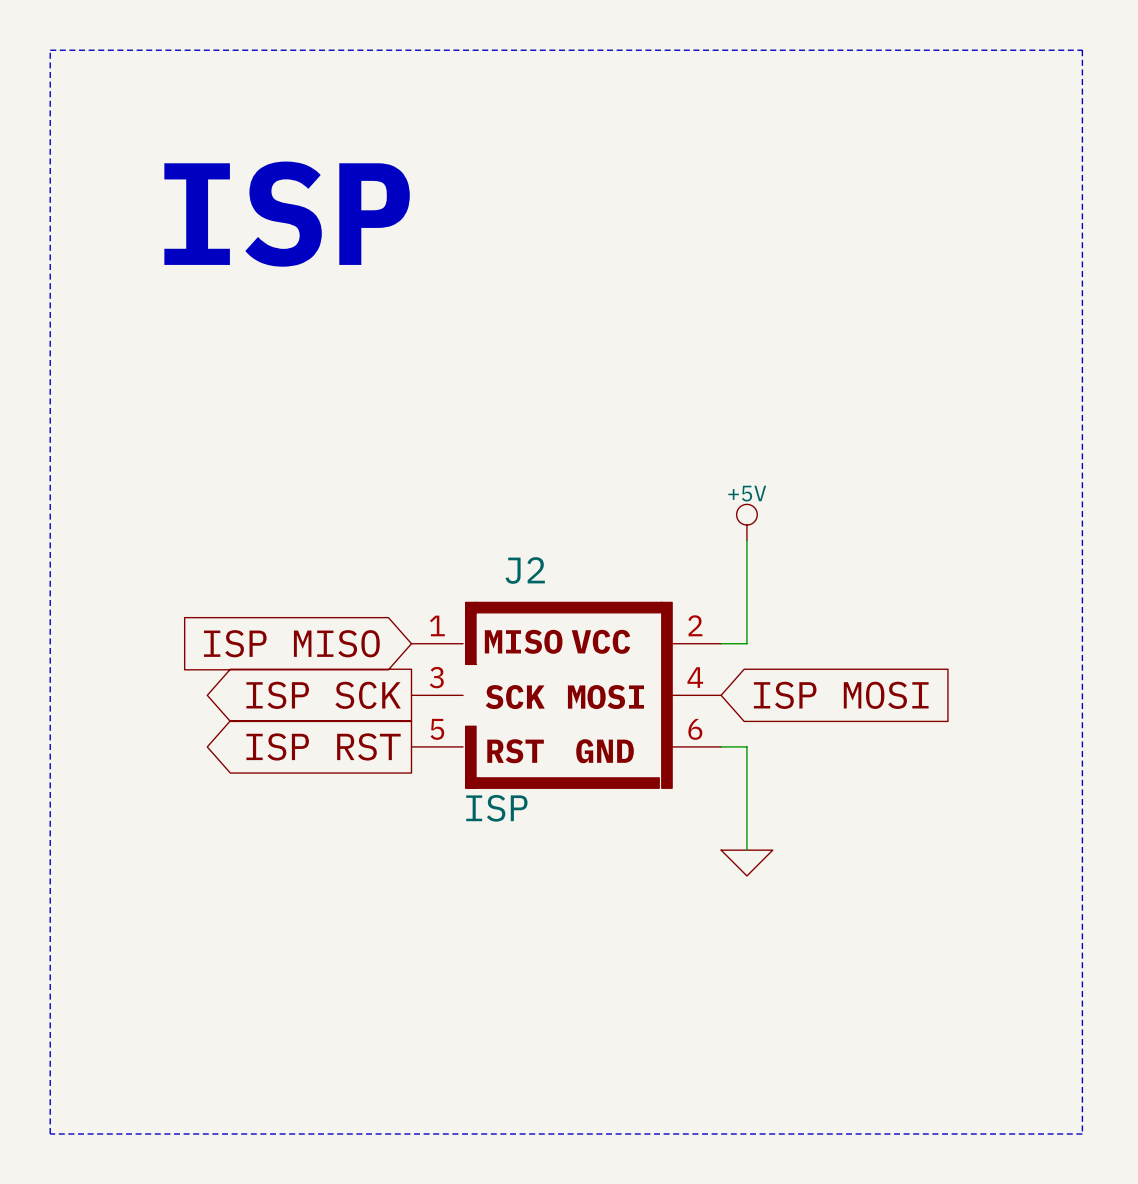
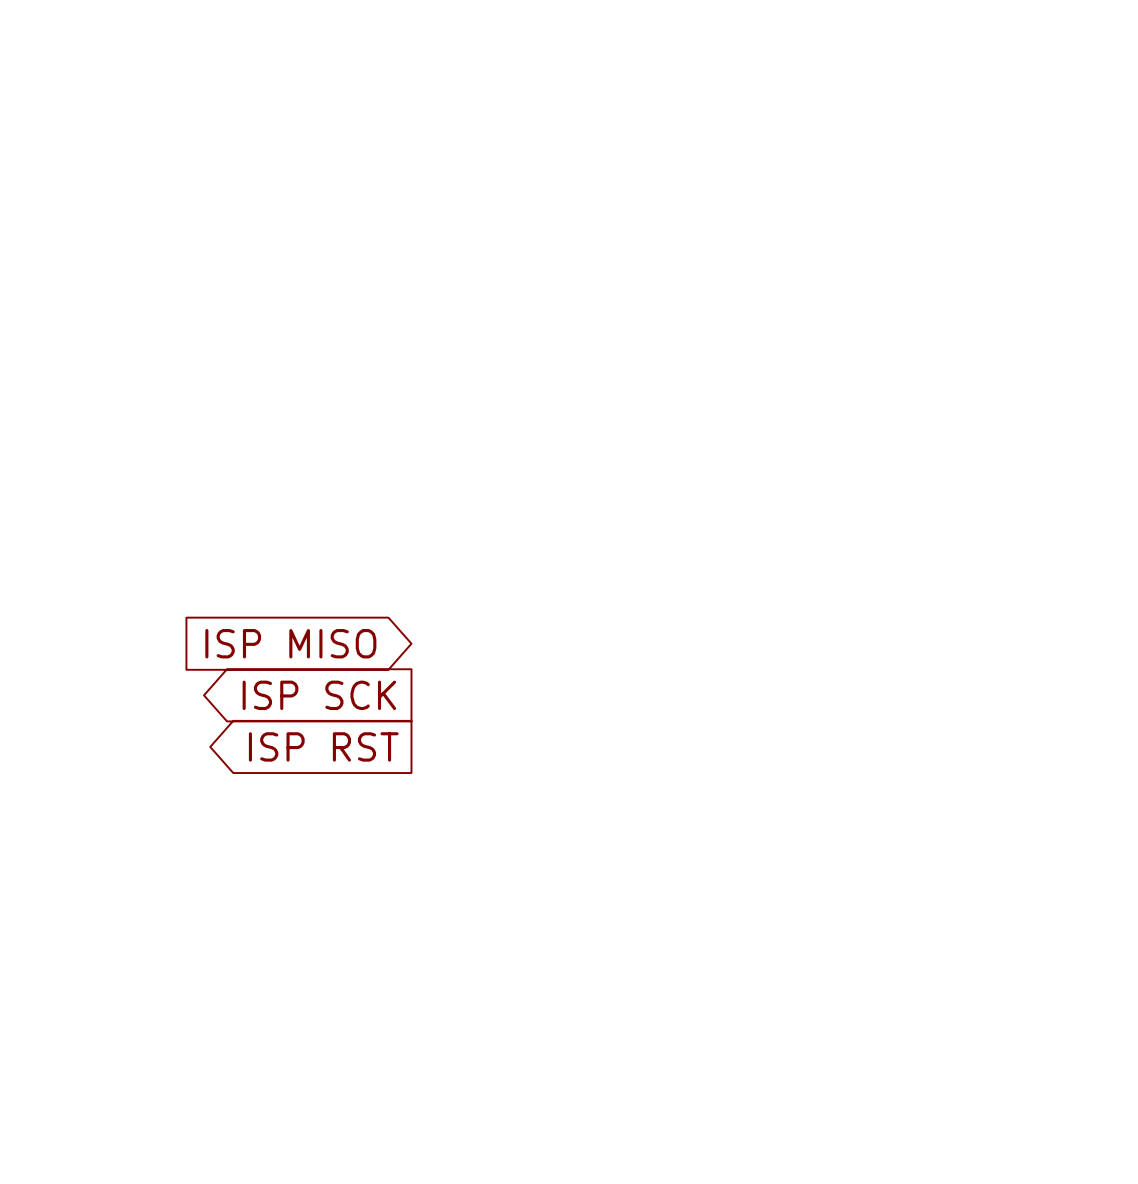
line: (50, 50) (1082, 50) (1082, 1134) (50, 1134) (50, 50) -> none
text: ISP (287, 214) -> none
power symbol: +5V (746, 522) -> none
wire: (746, 540) (746, 643) (721, 643) -> none
J2: ISP (566, 695) -> none
global label: ISP MOSI (841, 695) -> none
wire: (721, 746) (746, 746) (746, 850) -> none
power symbol: (746, 863) -> none

